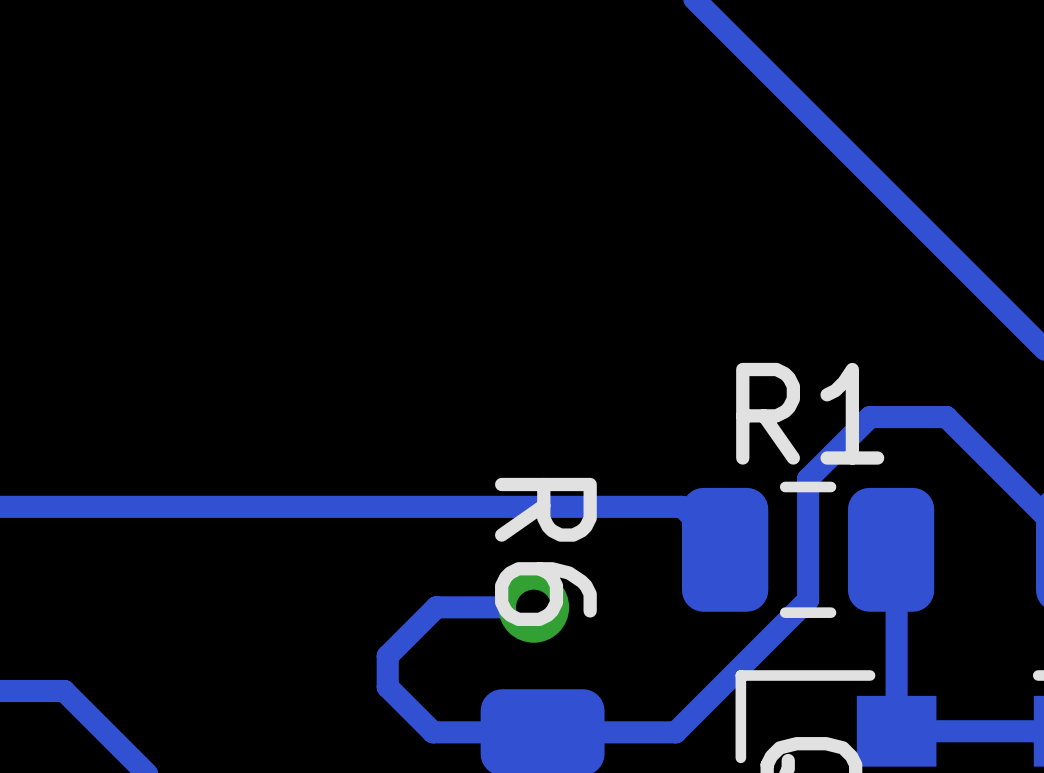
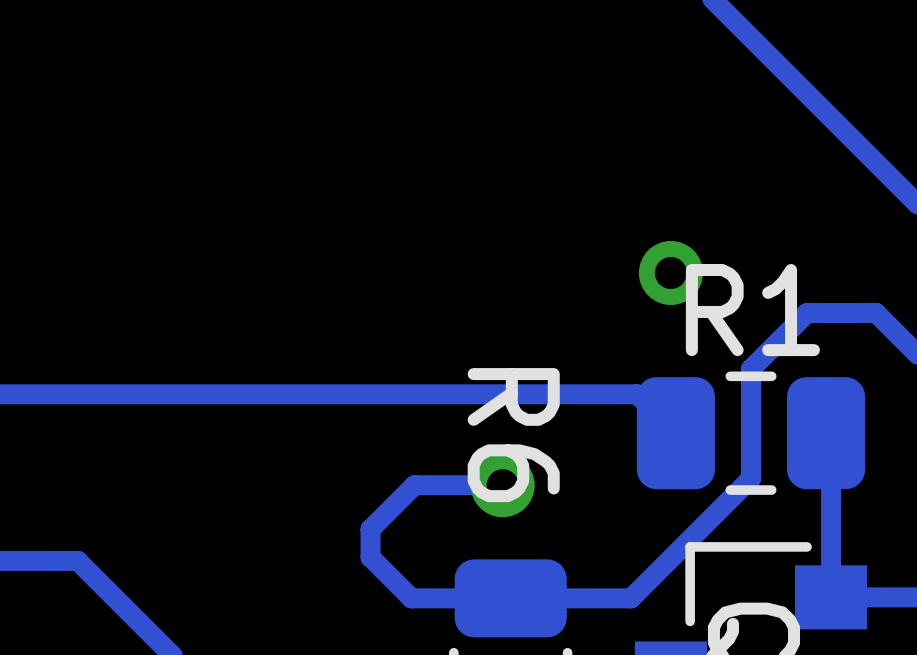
via: none -> (670, 272)

